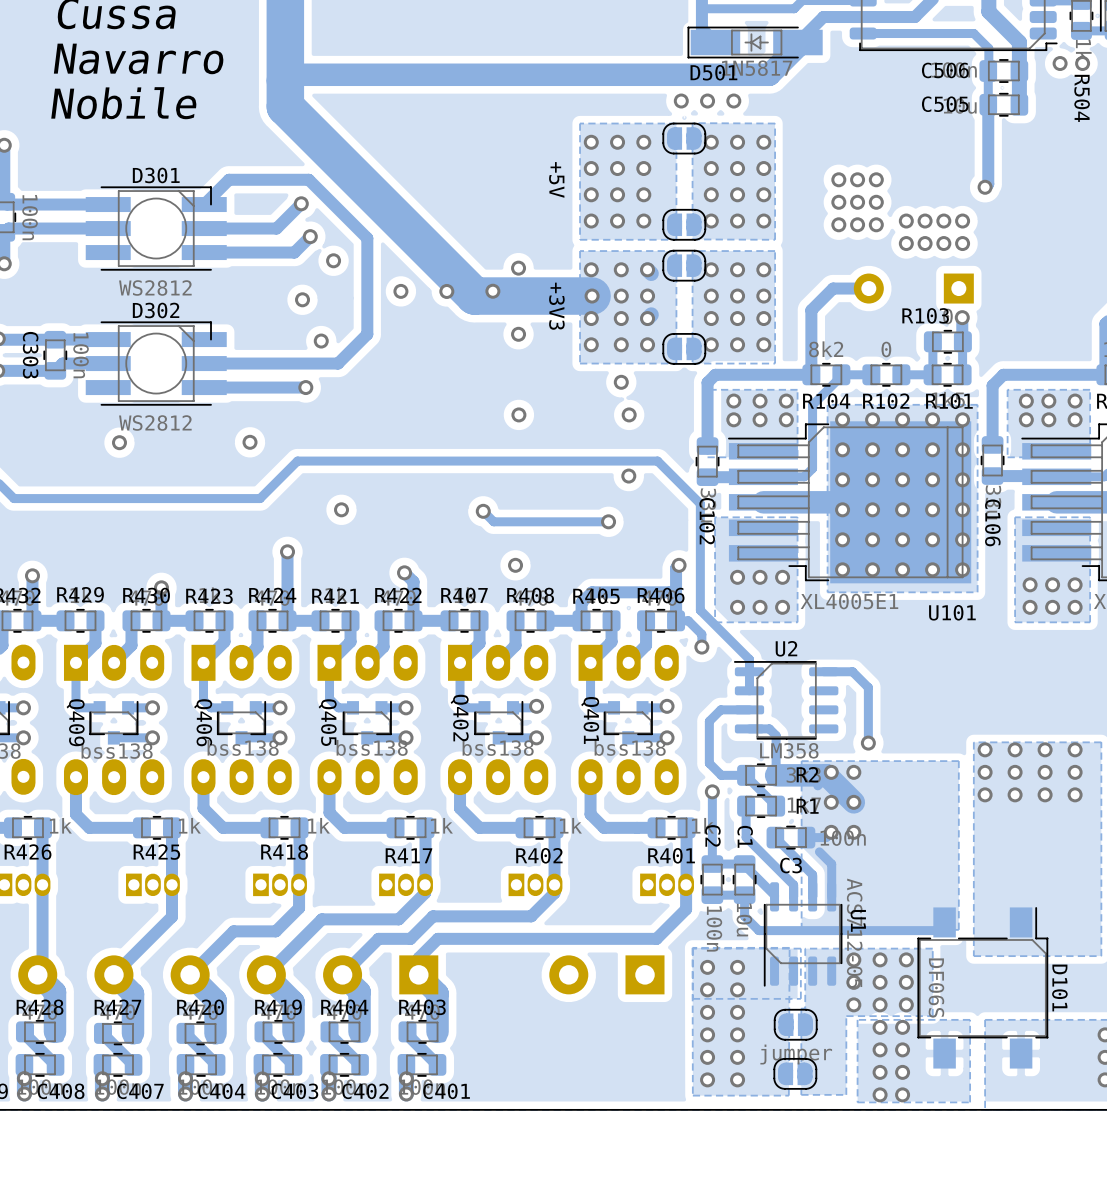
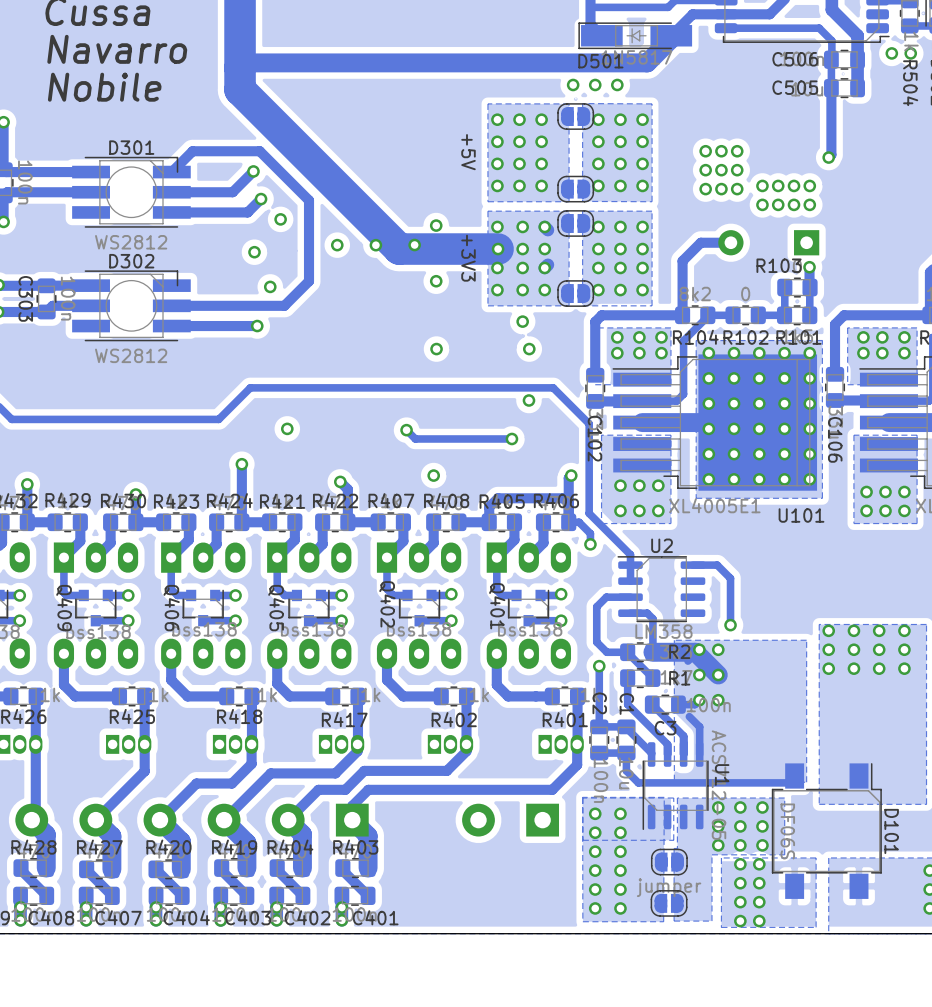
via: (119, 442) -> none
via: (250, 442) -> none

